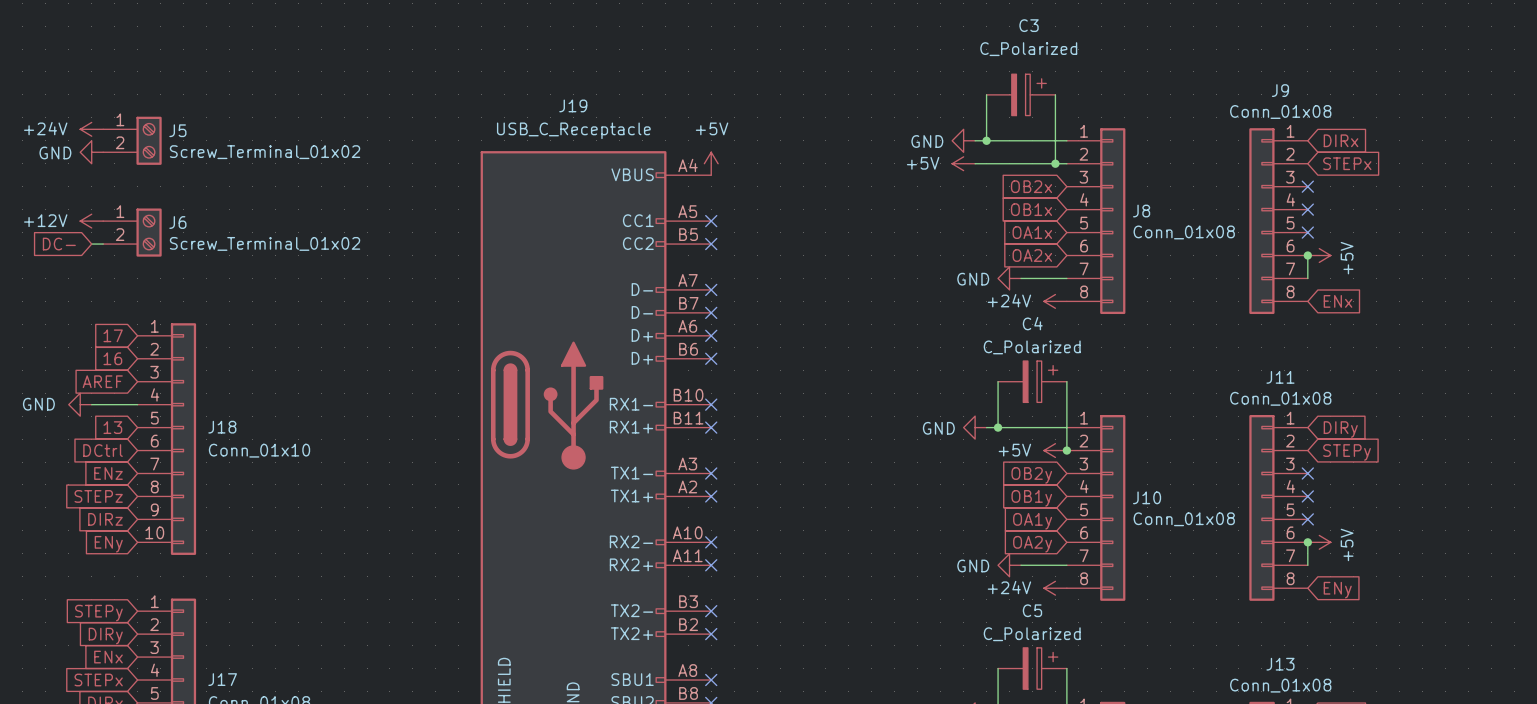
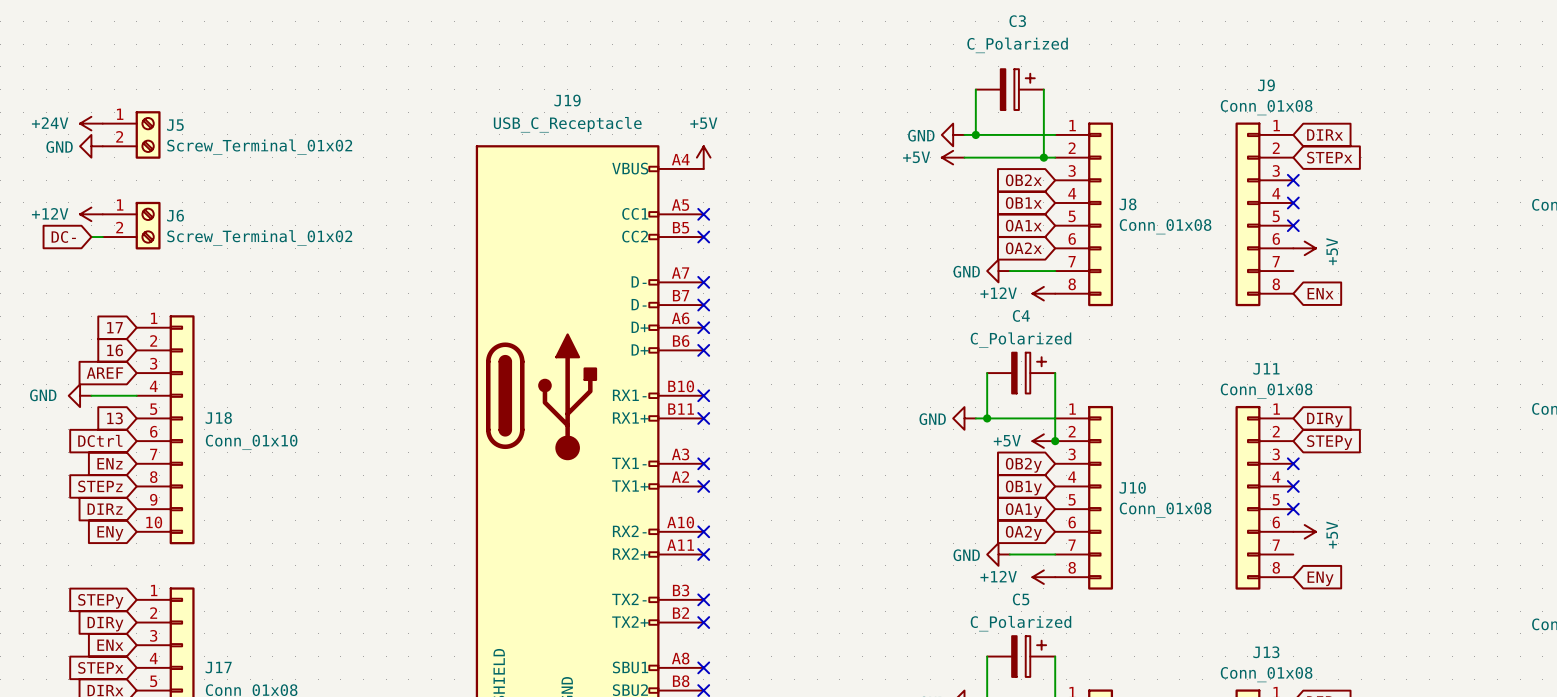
wire: (1307, 255) (1307, 278) -> none
junction: (1307, 255) -> none
power symbol: +24V (1055, 301) -> +12V (1043, 293)
wire: (1307, 542) (1307, 565) -> none
junction: (1307, 542) -> none
power symbol: +24V (1055, 588) -> +12V (1043, 577)

